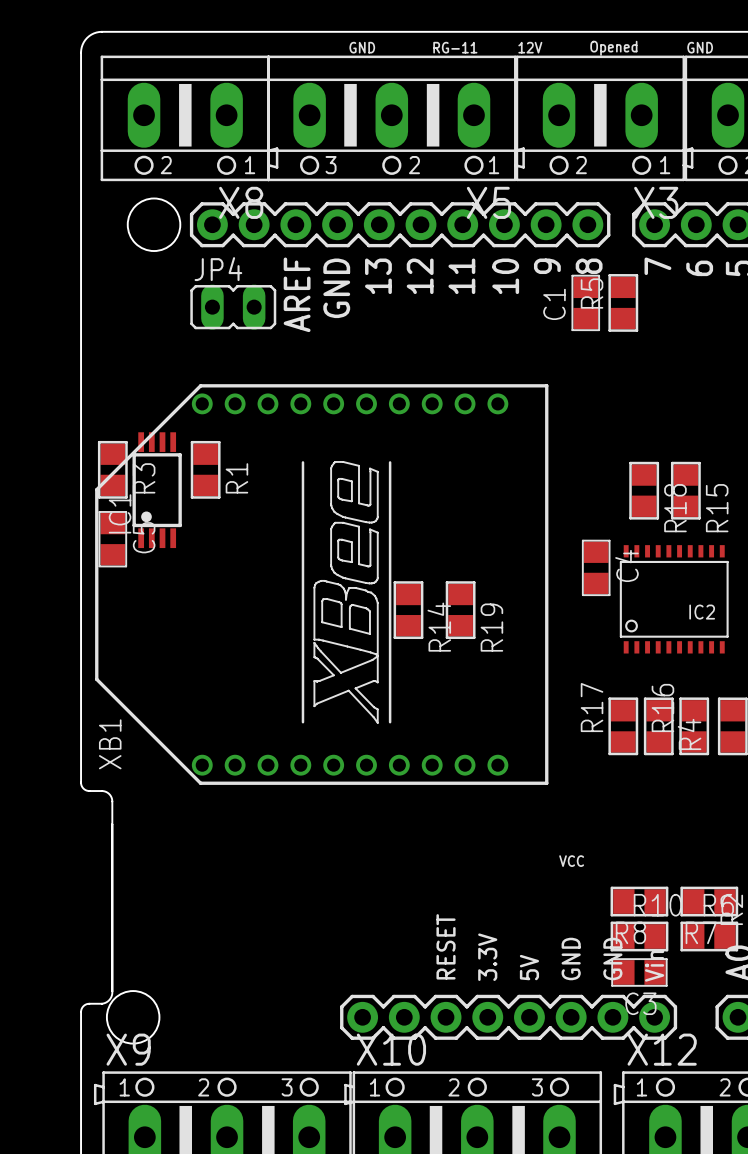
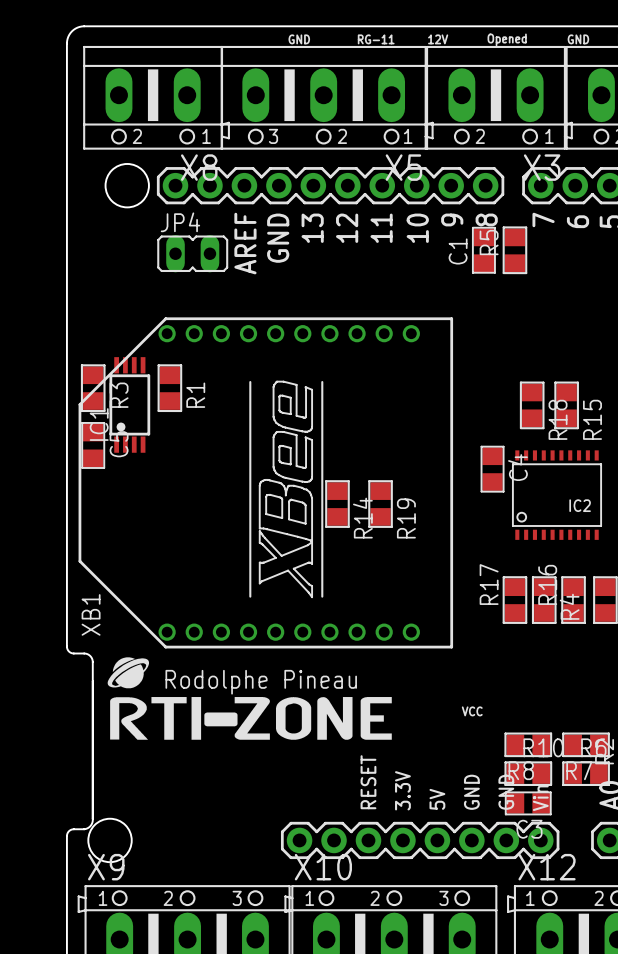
drawing: none -> [107, 657, 392, 740]

